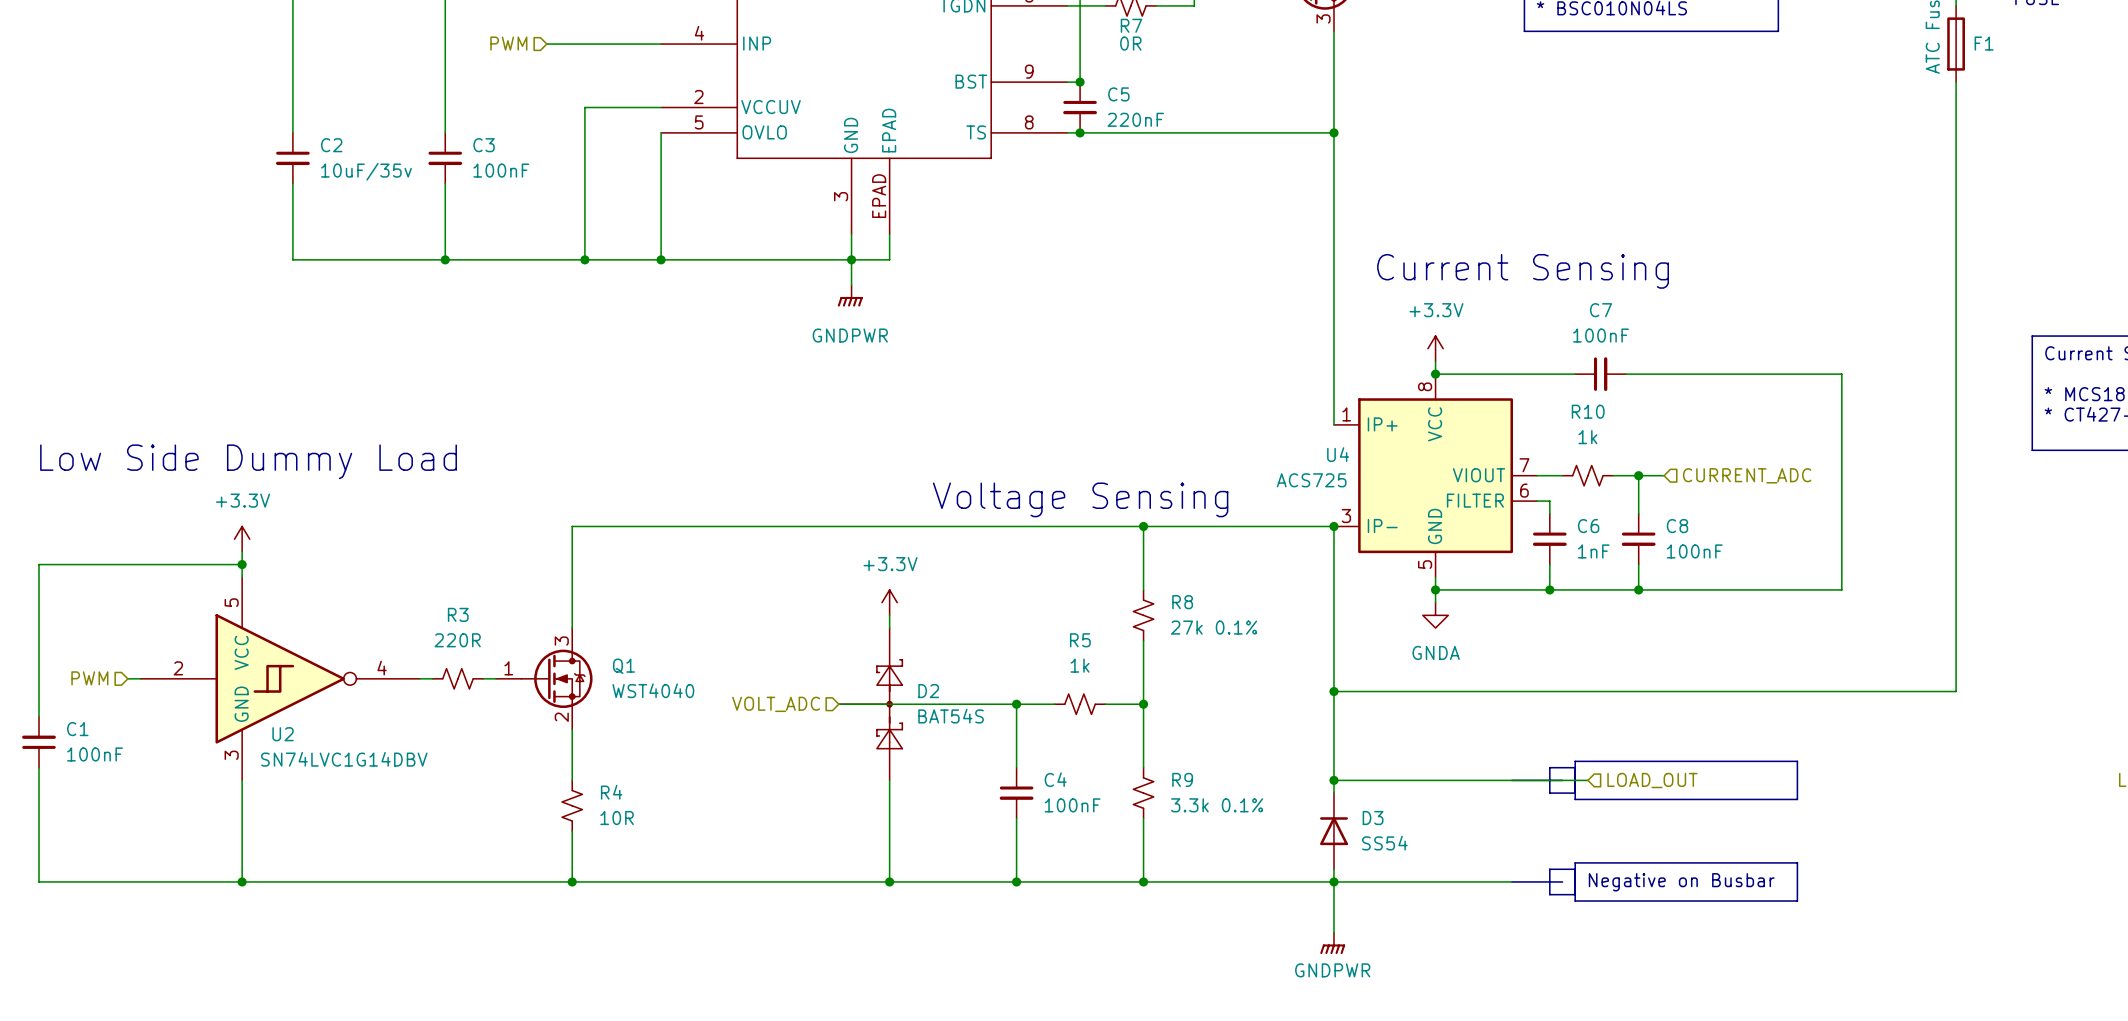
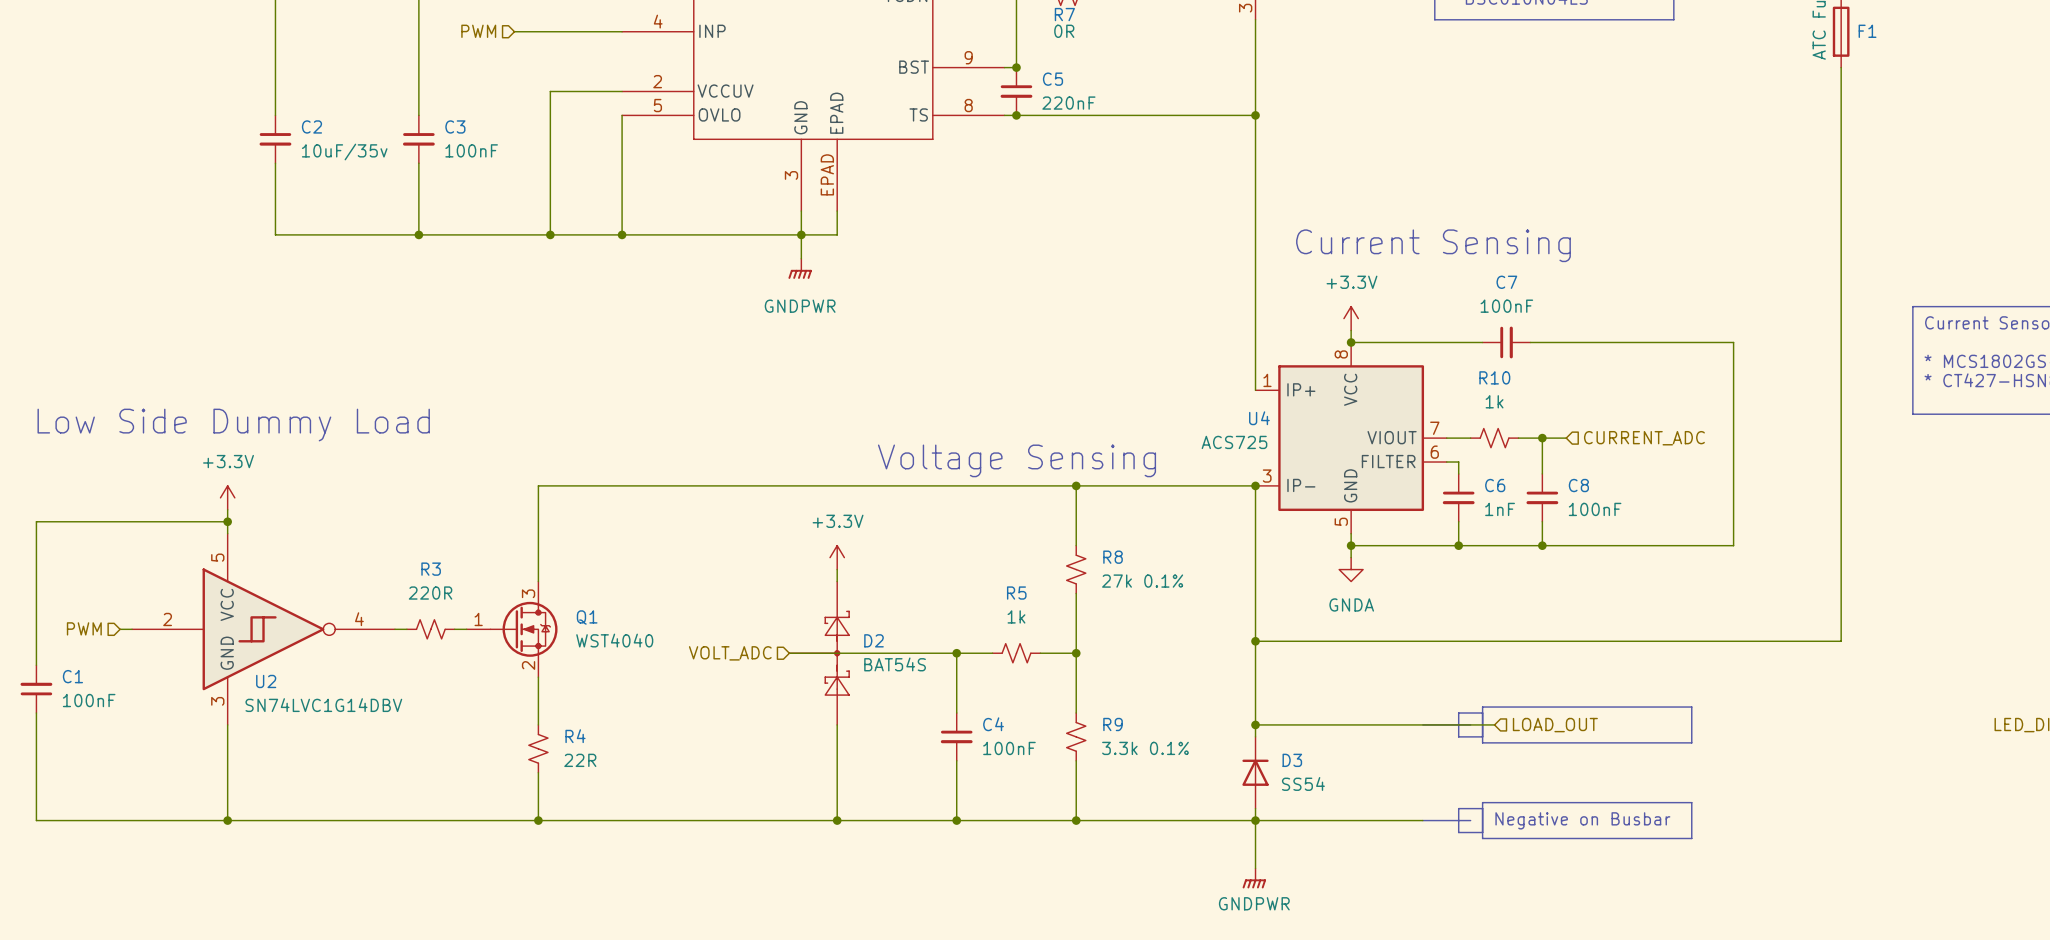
R4 value: 10R (617, 818) -> 22R (580, 760)

